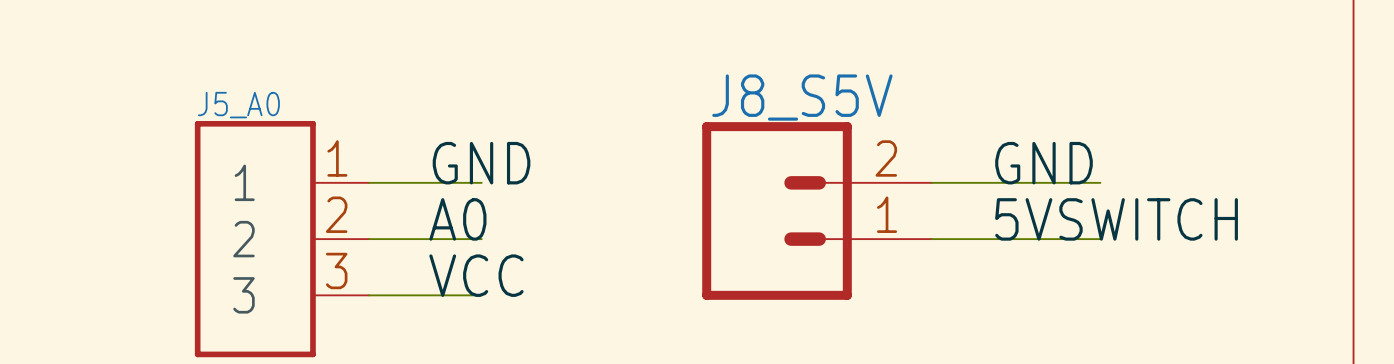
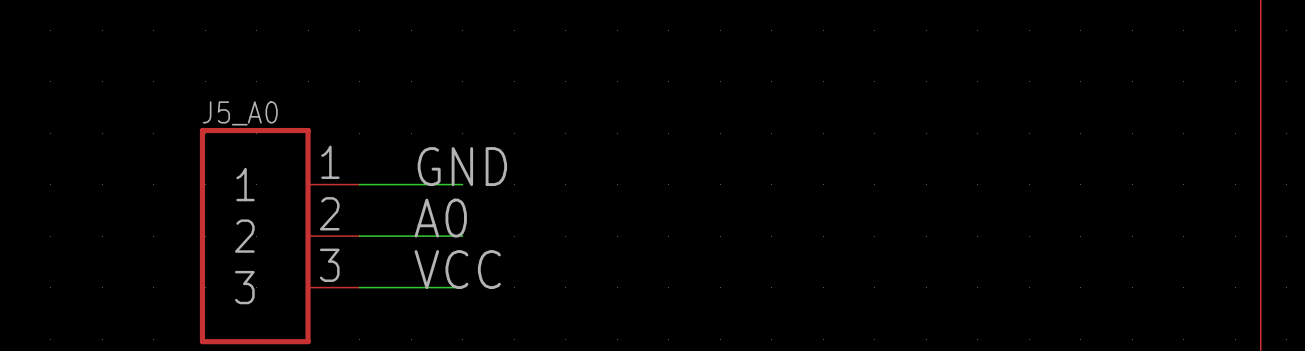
label: GND (1044, 163) -> none
wire: (931, 182) (1100, 182) -> none
J8_S5V: (816, 210) -> none
label: 5VSWITCH (1116, 219) -> none
wire: (931, 239) (1100, 239) -> none

